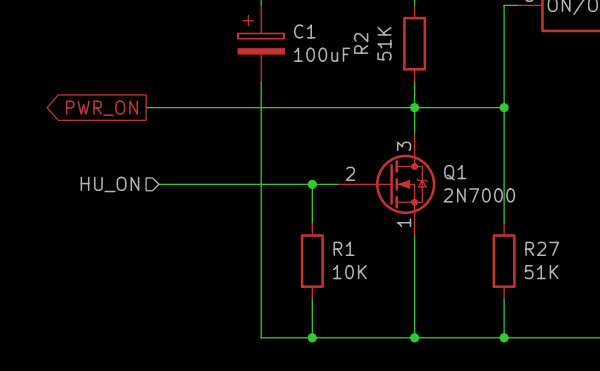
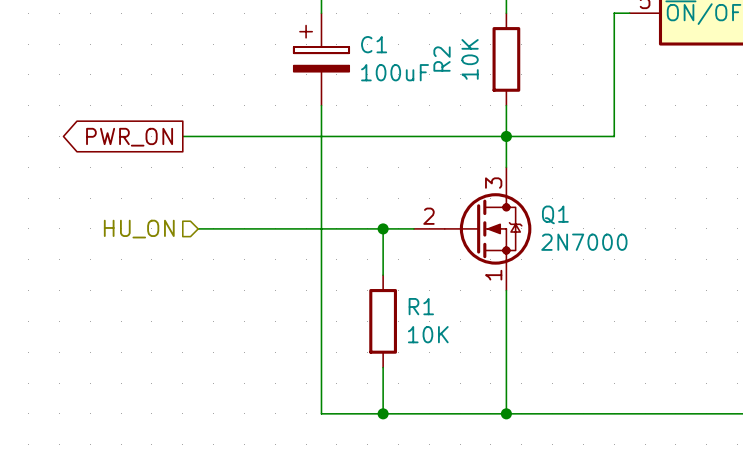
R2 value: 51K (384, 43) -> 10K (470, 59)
wire: (504, 107) (504, 222) -> none
junction: (504, 107) -> none
R27: 51K (504, 261) -> none
wire: (504, 299) (504, 337) -> none
junction: (504, 337) -> none

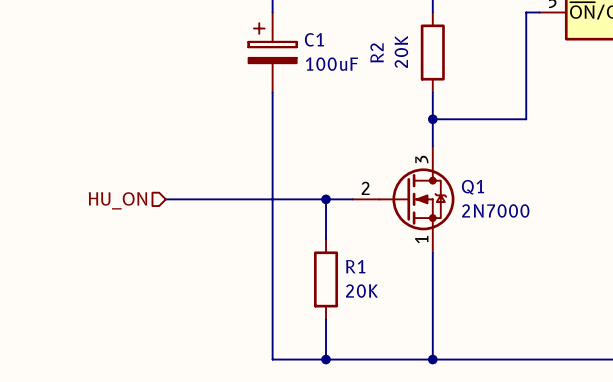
R2 value: 10K (470, 59) -> 20K (401, 51)
wire: (182, 136) (506, 136) -> none
global label: PWR_ON (129, 137) -> none
R1 value: 10K (428, 334) -> 20K (362, 291)

